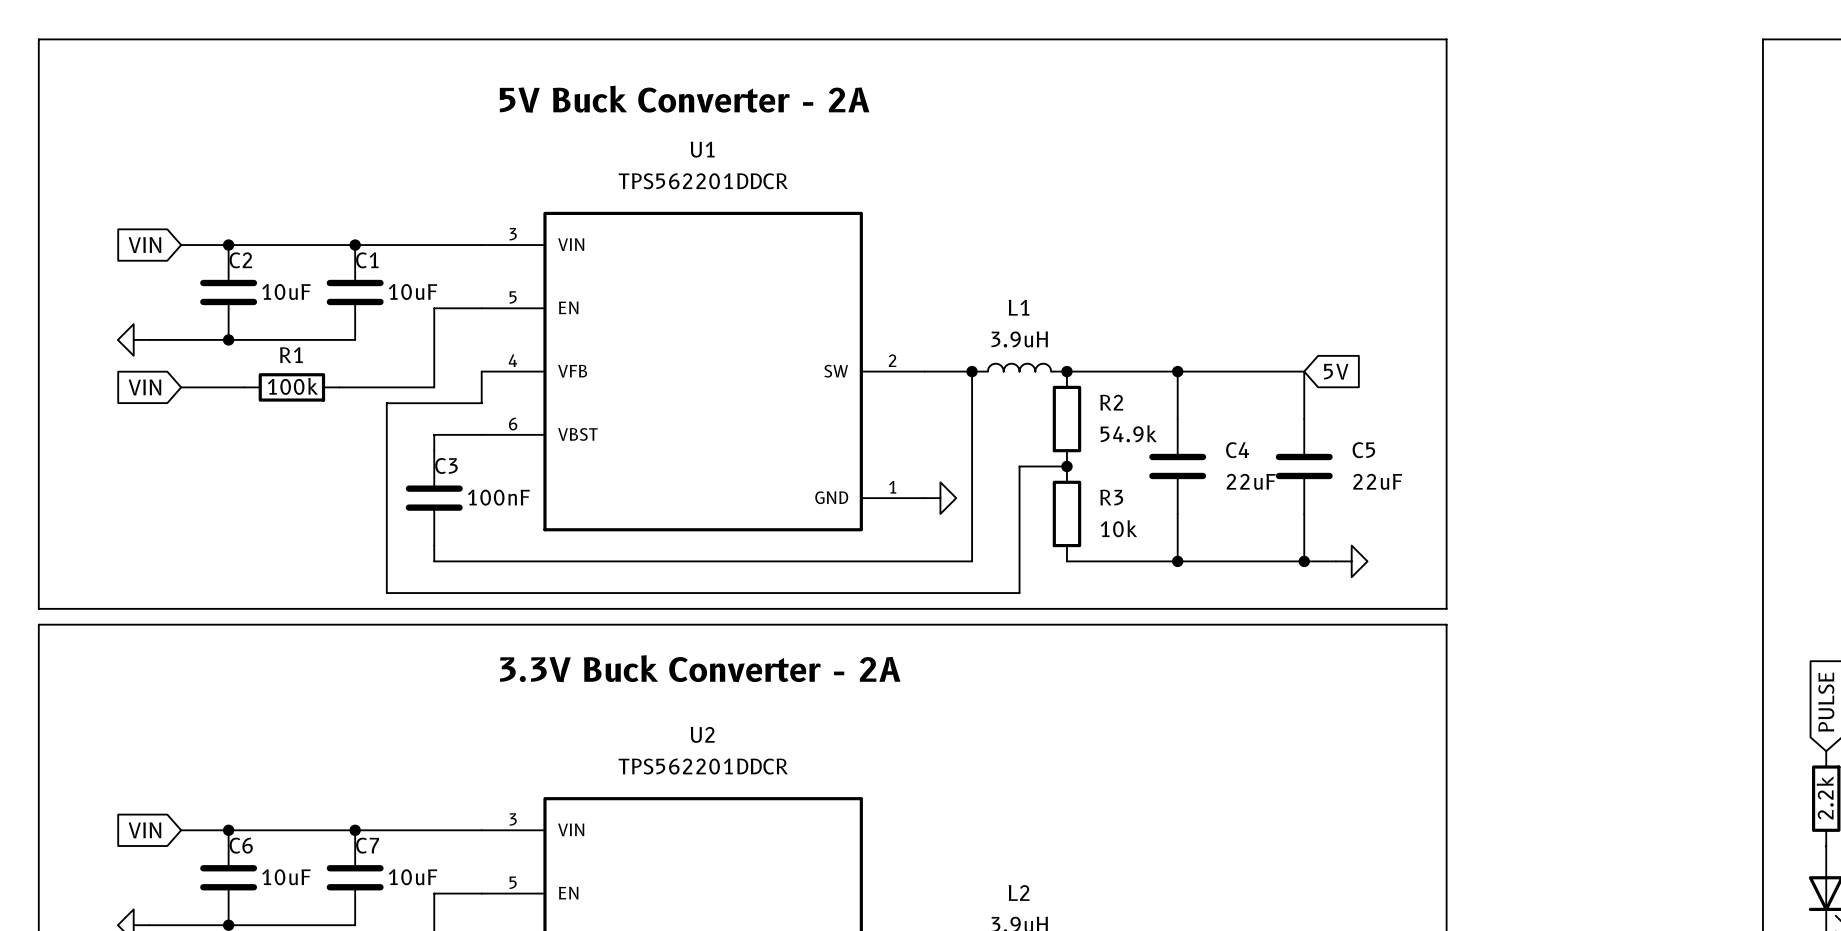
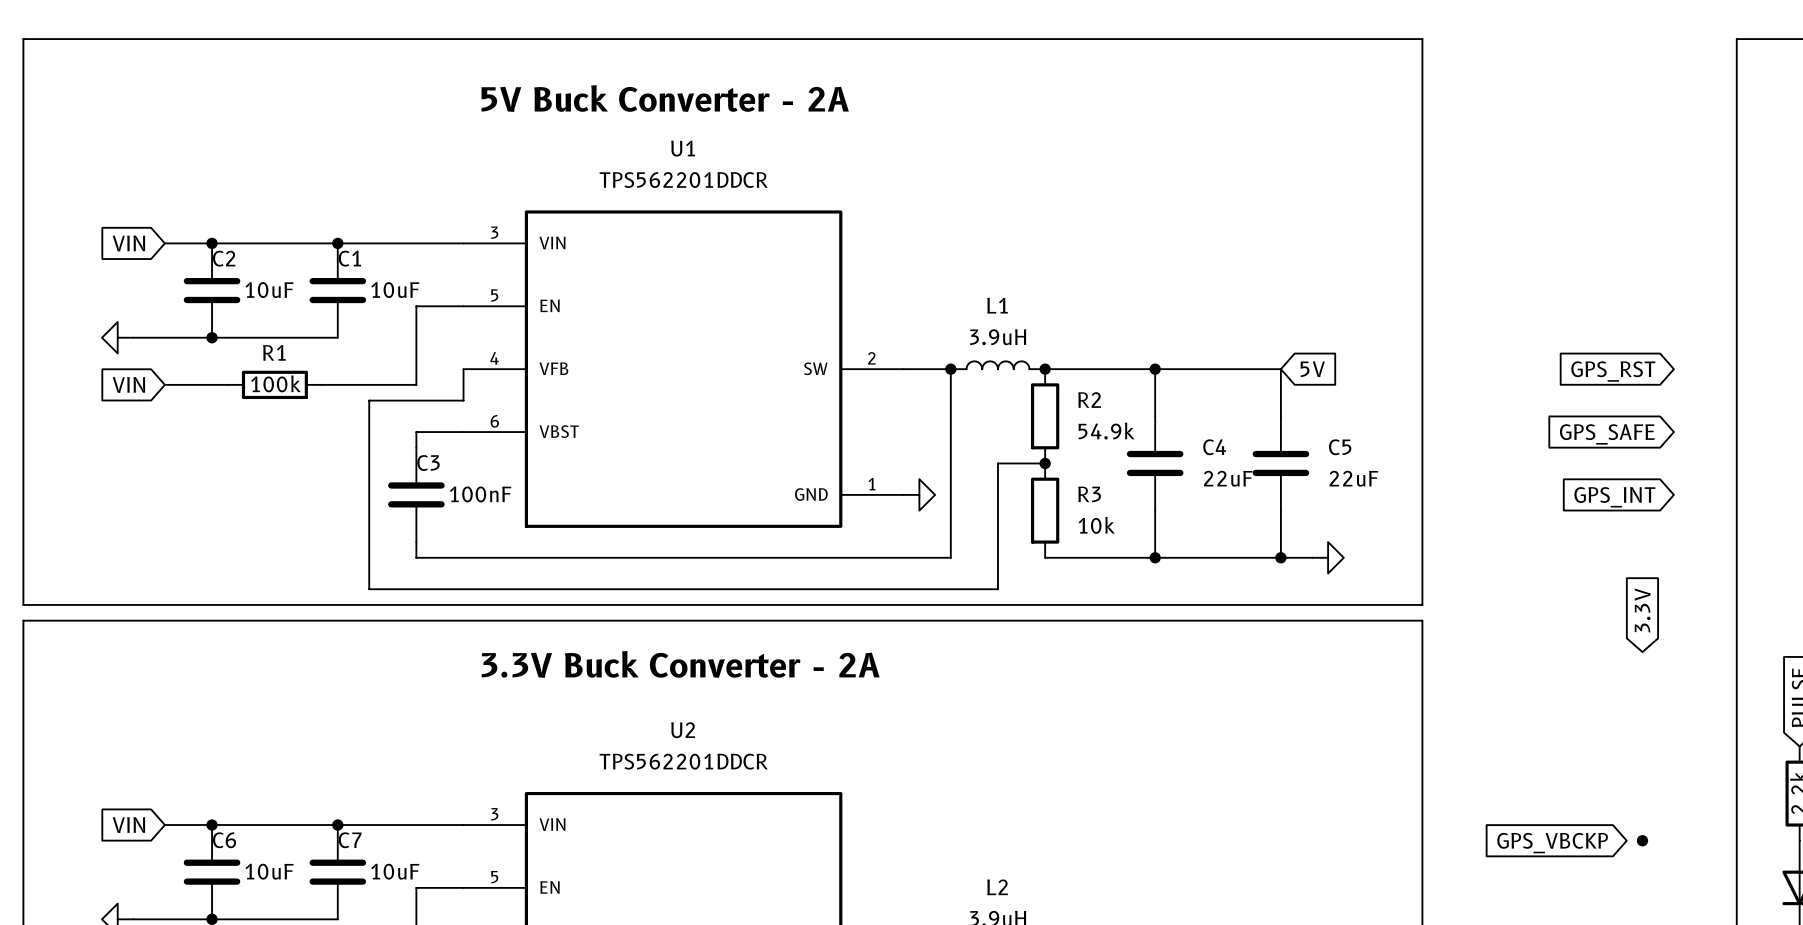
global label: none -> GPS_RST (1613, 371)
global label: none -> GPS_SAFE (1607, 434)
global label: none -> GPS_INT (1614, 497)
global label: none -> 3.3V (1642, 610)
junction: none -> (1642, 840)
global label: none -> GPS_VBCKP (1552, 843)

